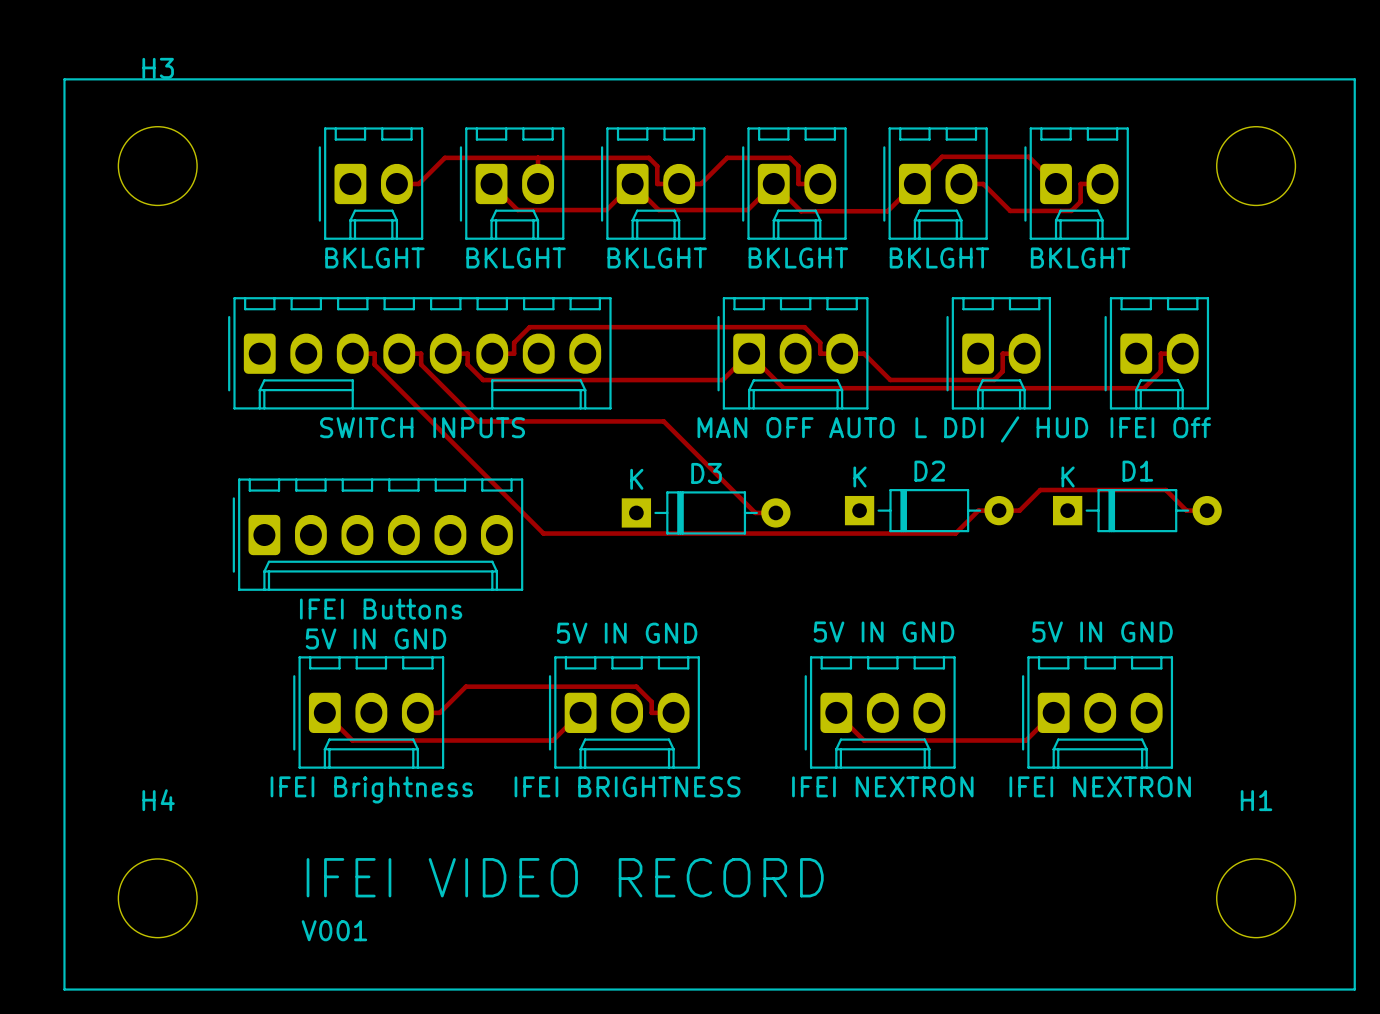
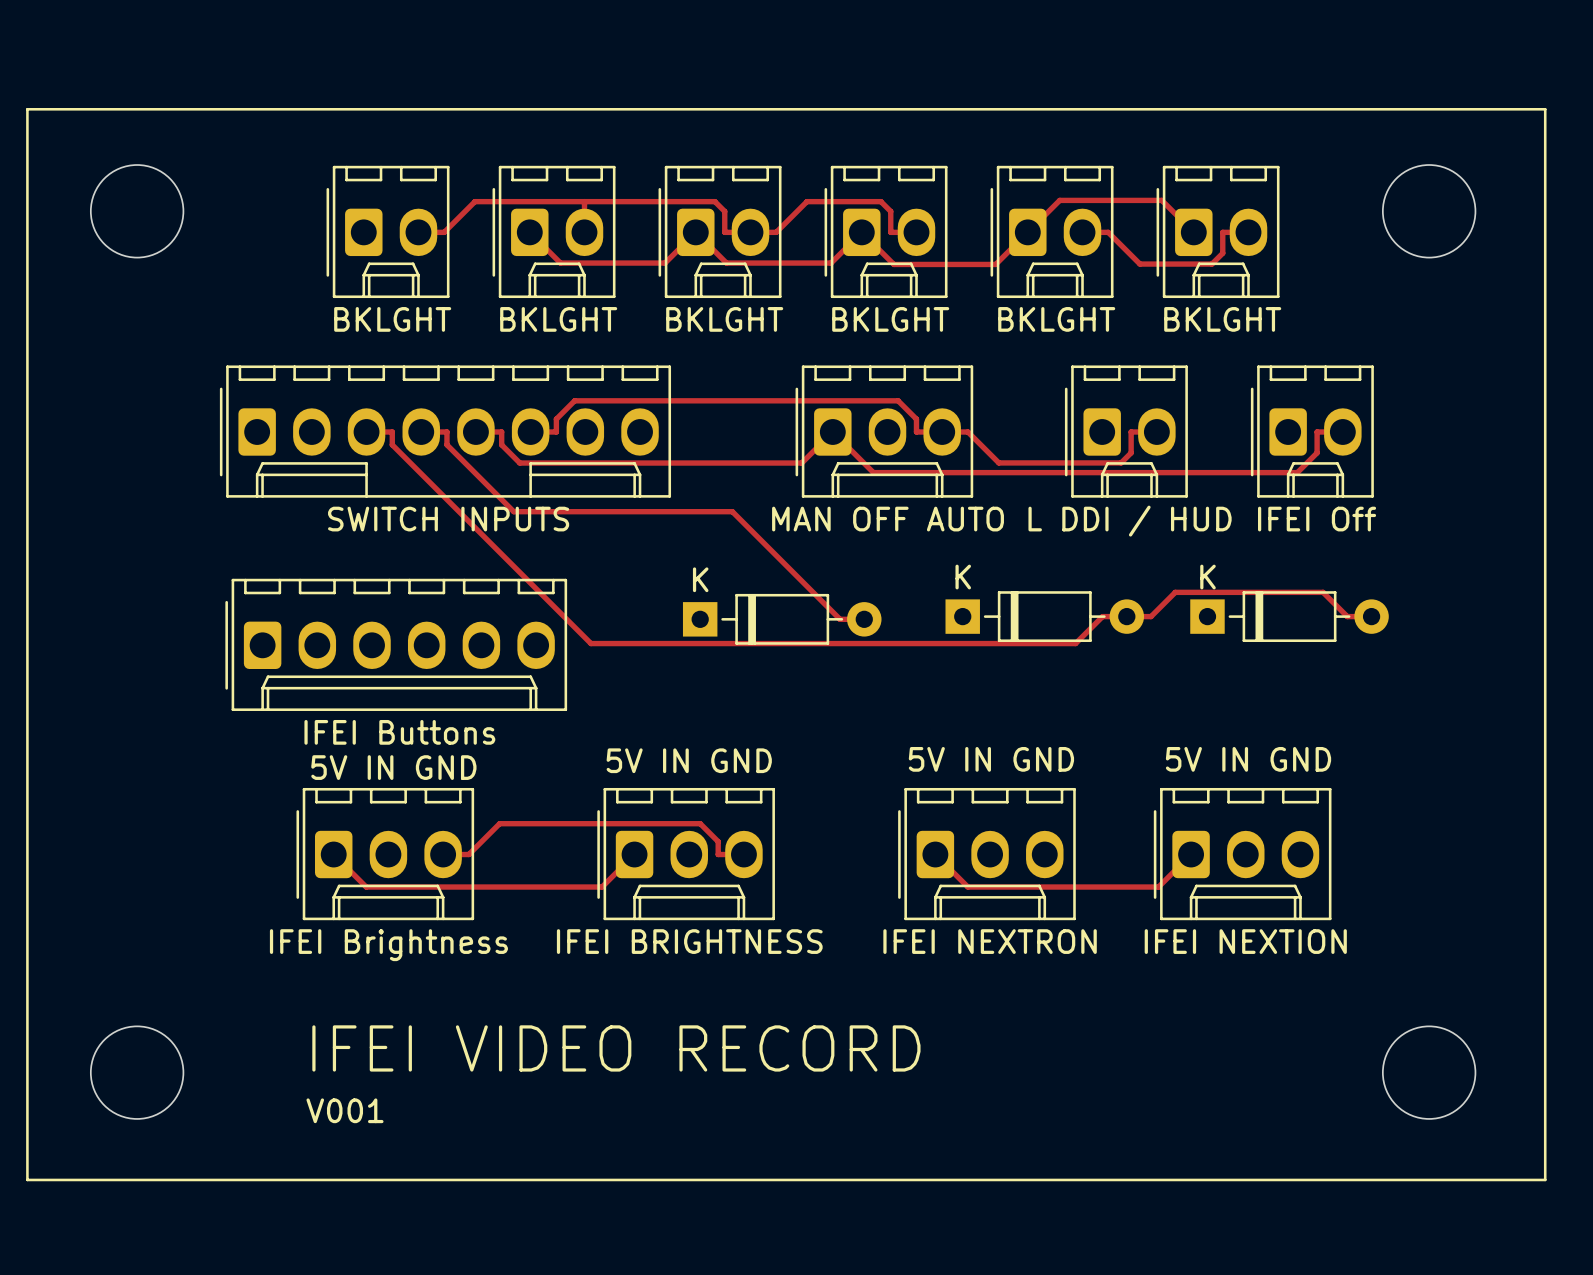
H3 name: H3 (158, 68) -> none
D2 name: D2 (929, 471) -> none
D1 name: D1 (1137, 471) -> none
D3 name: D3 (706, 473) -> none
part value: IFEI NEXTRON (1100, 786) -> IFEI NEXTION (1245, 941)
H4 name: H4 (158, 800) -> none
H1 name: H1 (1256, 800) -> none

